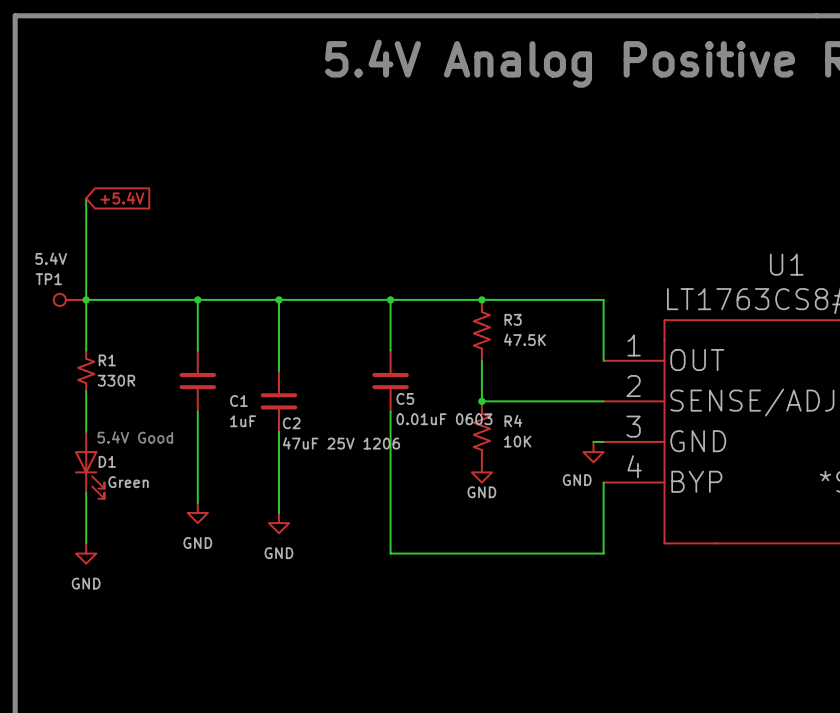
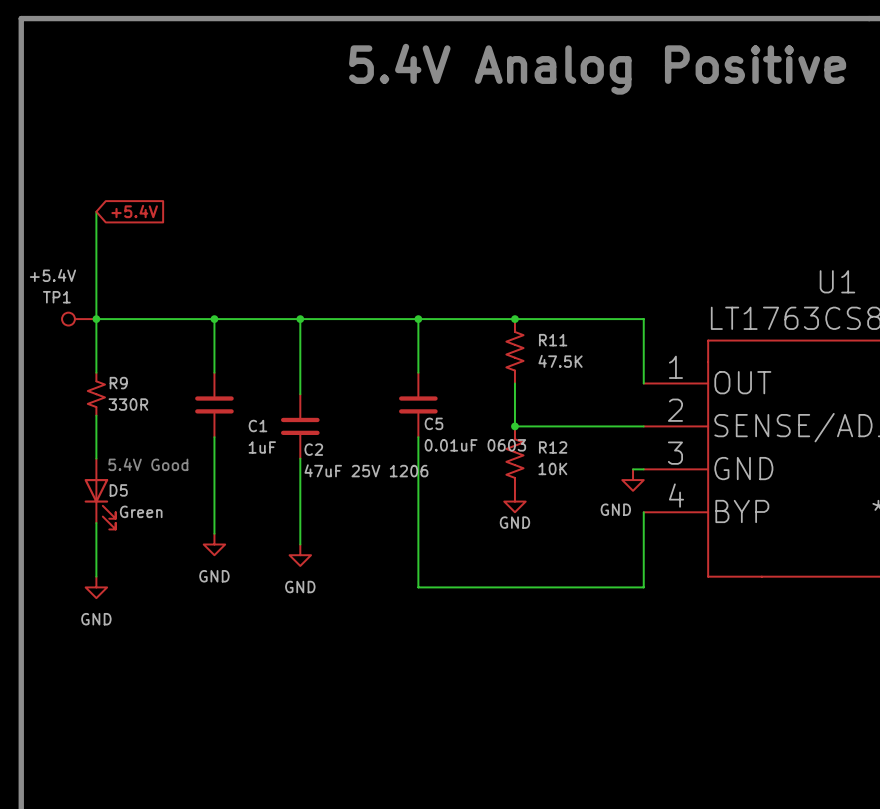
TP1 value: 5.4V (51, 258) -> +5.4V (52, 275)
R3 name: R3 (513, 319) -> R11 (553, 340)
R1 name: R1 (107, 360) -> R9 (118, 383)
R4 name: R4 (513, 421) -> R12 (553, 447)
D1 name: D1 (107, 461) -> D5 (118, 490)

